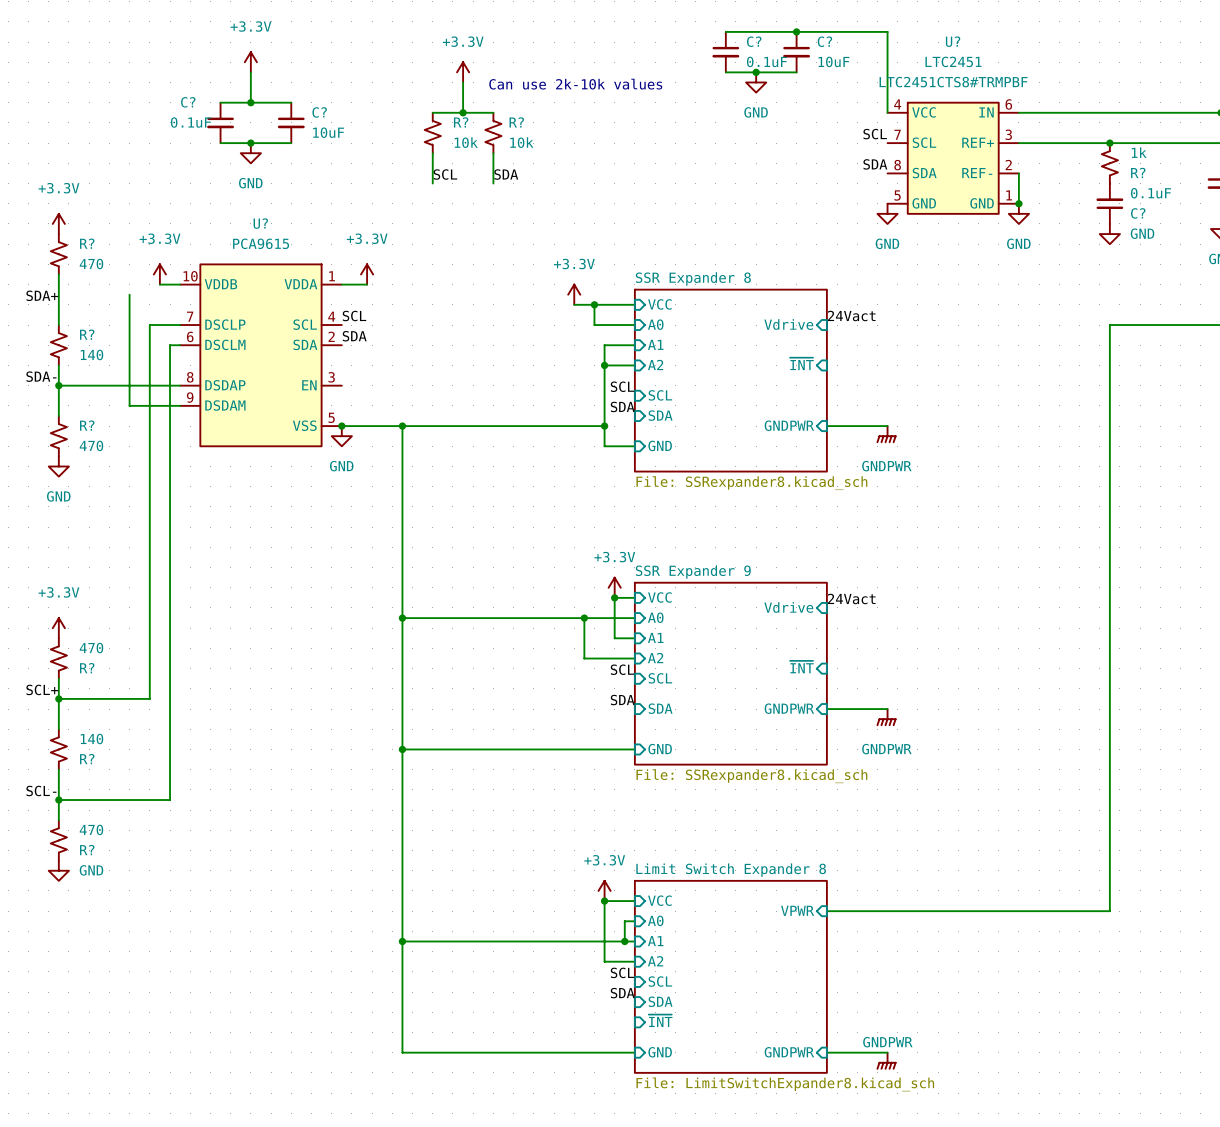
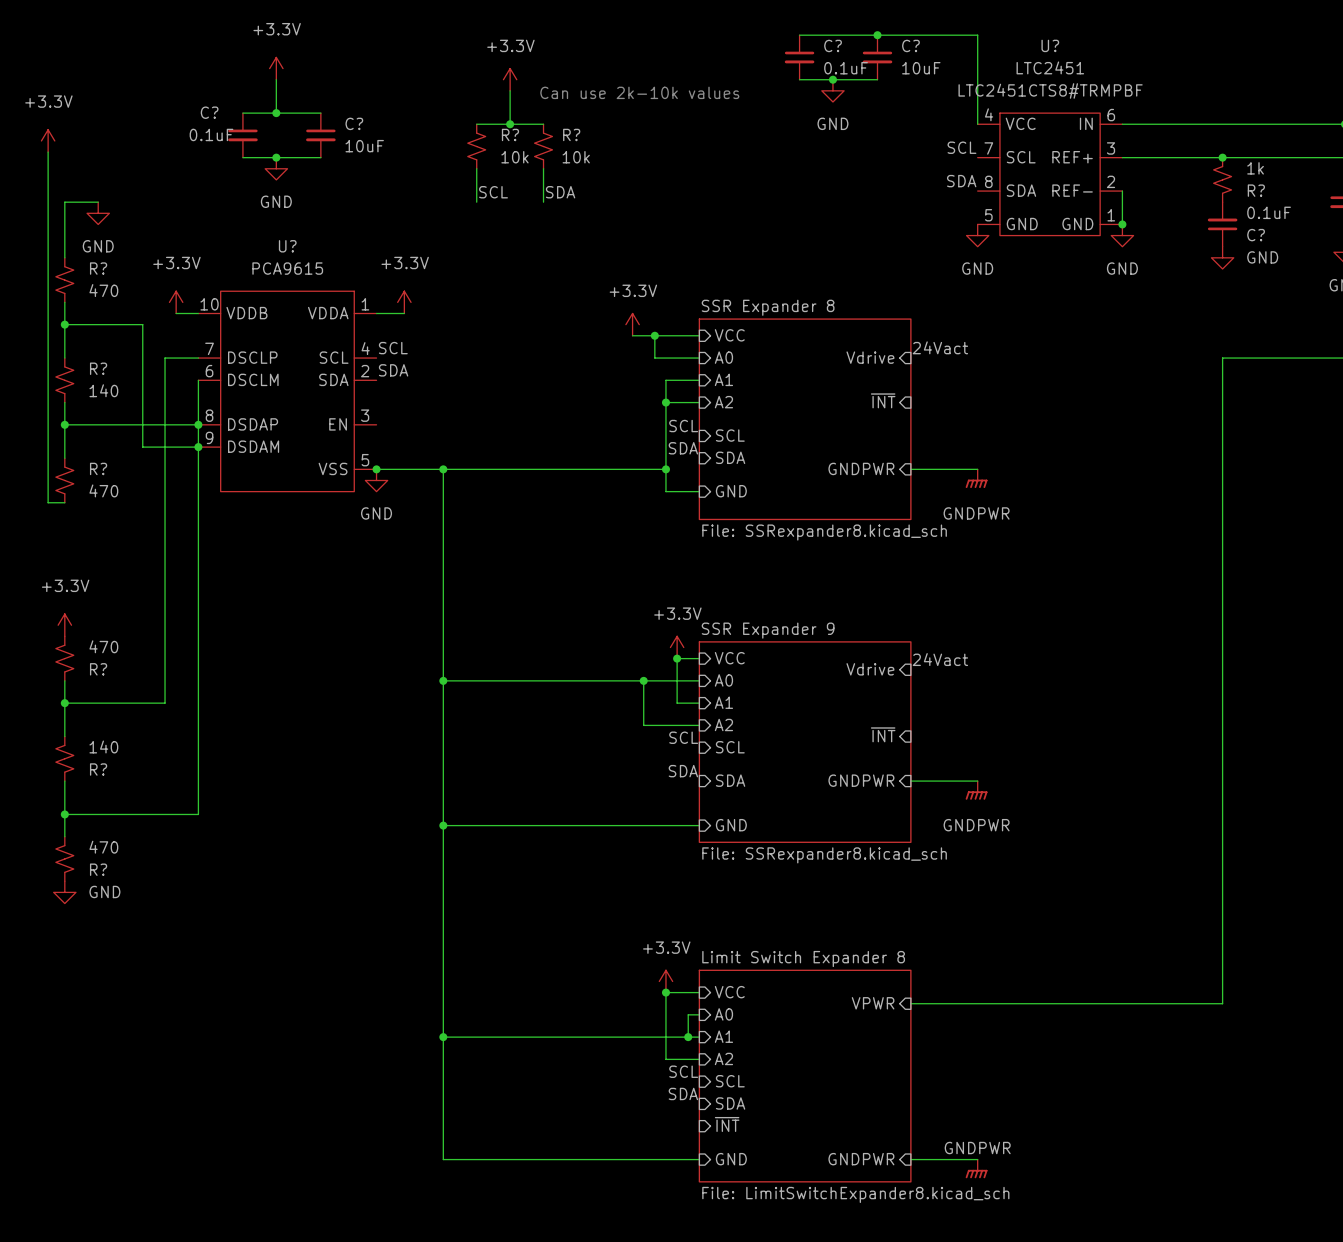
wire: none -> (48, 152) (48, 502) (64, 502)
wire: none -> (98, 202) (64, 202) (64, 257)
power symbol: none -> GND (98, 213)
power symbol position: +3.3V (58, 223) -> +3.3V (48, 140)
wire: none -> (64, 324) (142, 324)
junction: none -> (64, 324)
label: SDA+ (42, 295) -> none
wire: (180, 345) (170, 345) (170, 800) (58, 800) -> (198, 380) (198, 814) (64, 814)
label: SDA- (41, 376) -> none
junction: none -> (198, 424)
junction: none -> (198, 447)
power symbol: GND (58, 466) -> none
R?: none -> 470 (64, 658)
power symbol position: +3.3V (58, 628) -> +3.3V (64, 625)
junction: none -> (64, 703)
wire: (149, 638) (149, 698) (58, 698) -> (165, 703) (64, 703)
R?: 470 (58, 658) -> none
wire: (58, 678) (58, 709) -> (64, 803) (64, 836)
label: SCL+ (42, 689) -> none
junction: (58, 698) -> none
junction: none -> (64, 814)
R? position: (58, 749) -> (64, 758)
R?: none -> 470 (64, 858)
label: SCL- (41, 790) -> none
junction: (58, 800) -> none
R?: 470 (58, 840) -> none
power symbol position: GND (58, 870) -> GND (64, 892)

